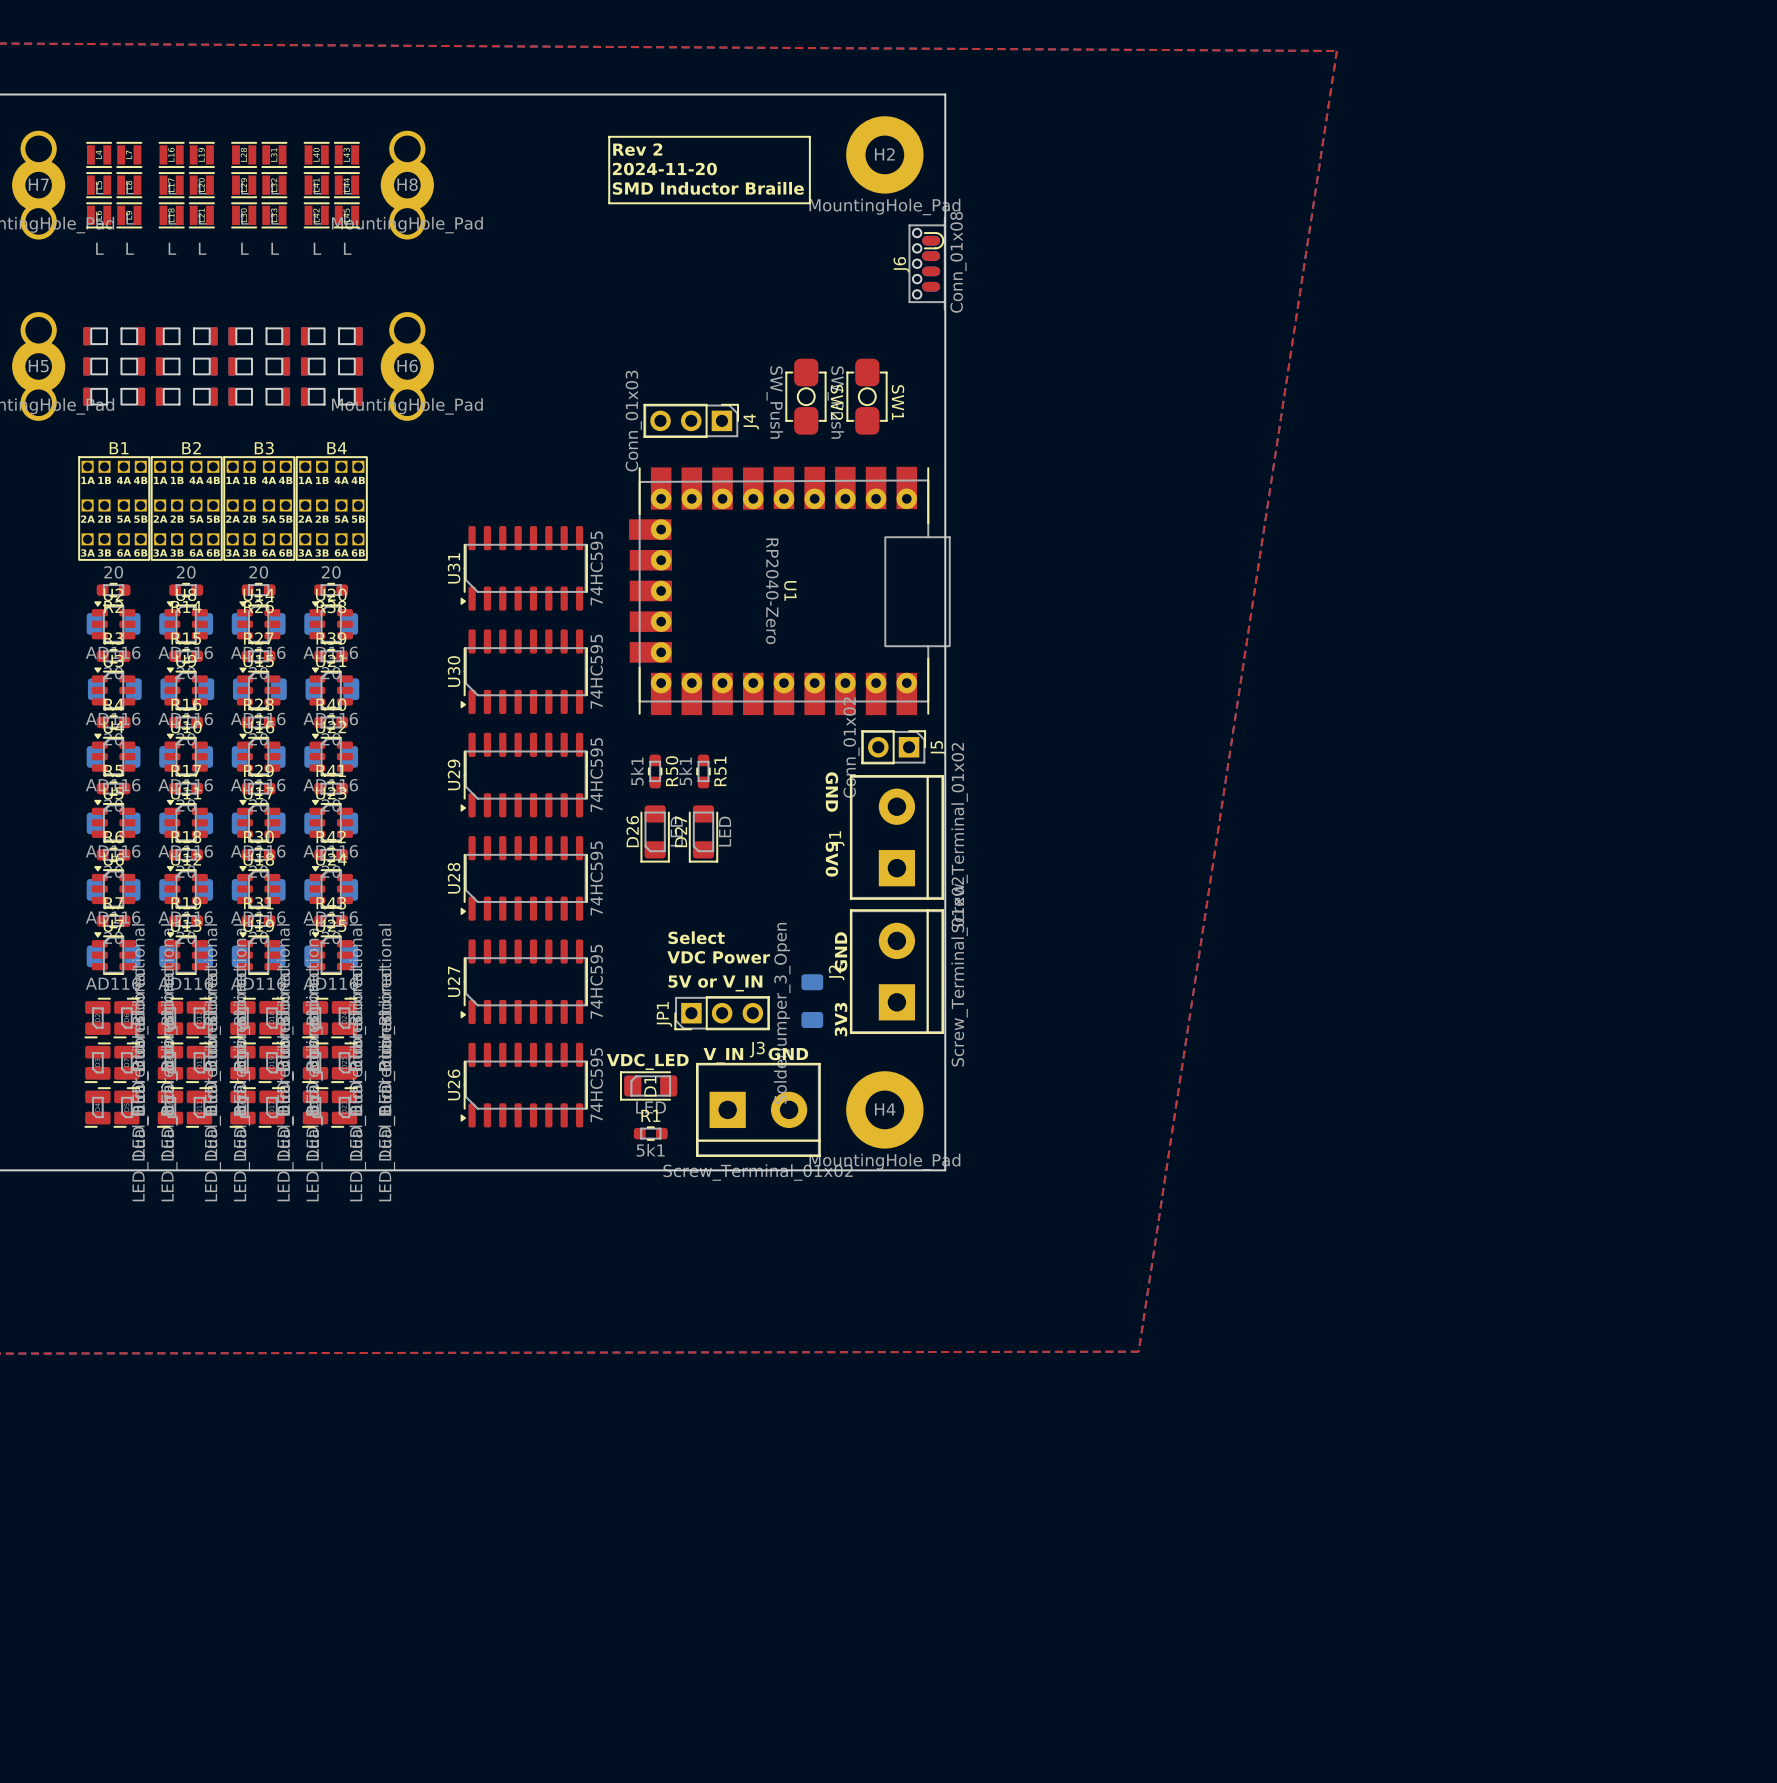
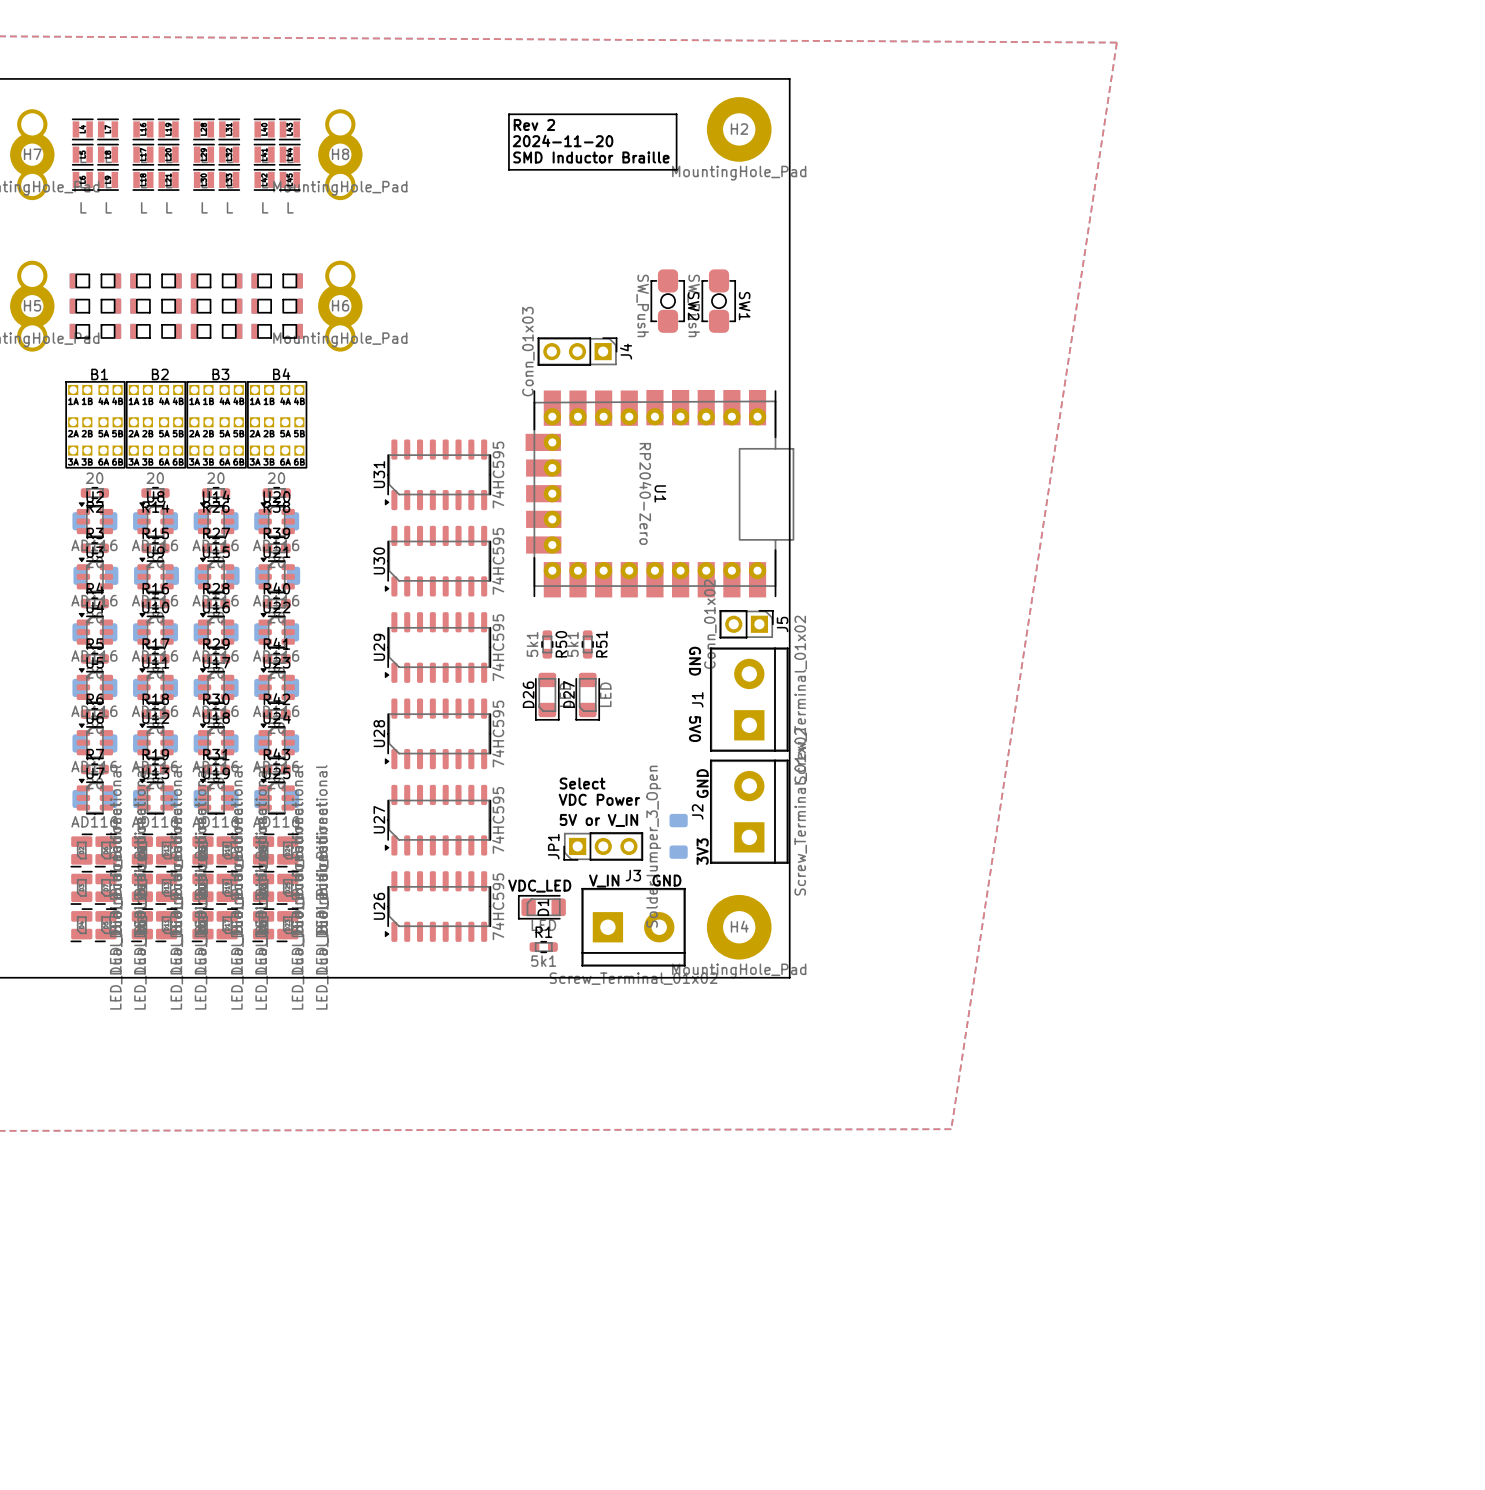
J6: Conn_01x08 (927, 263) -> none
SW2 position: (805, 396) -> (667, 301)
SW1 position: (867, 396) -> (718, 301)

